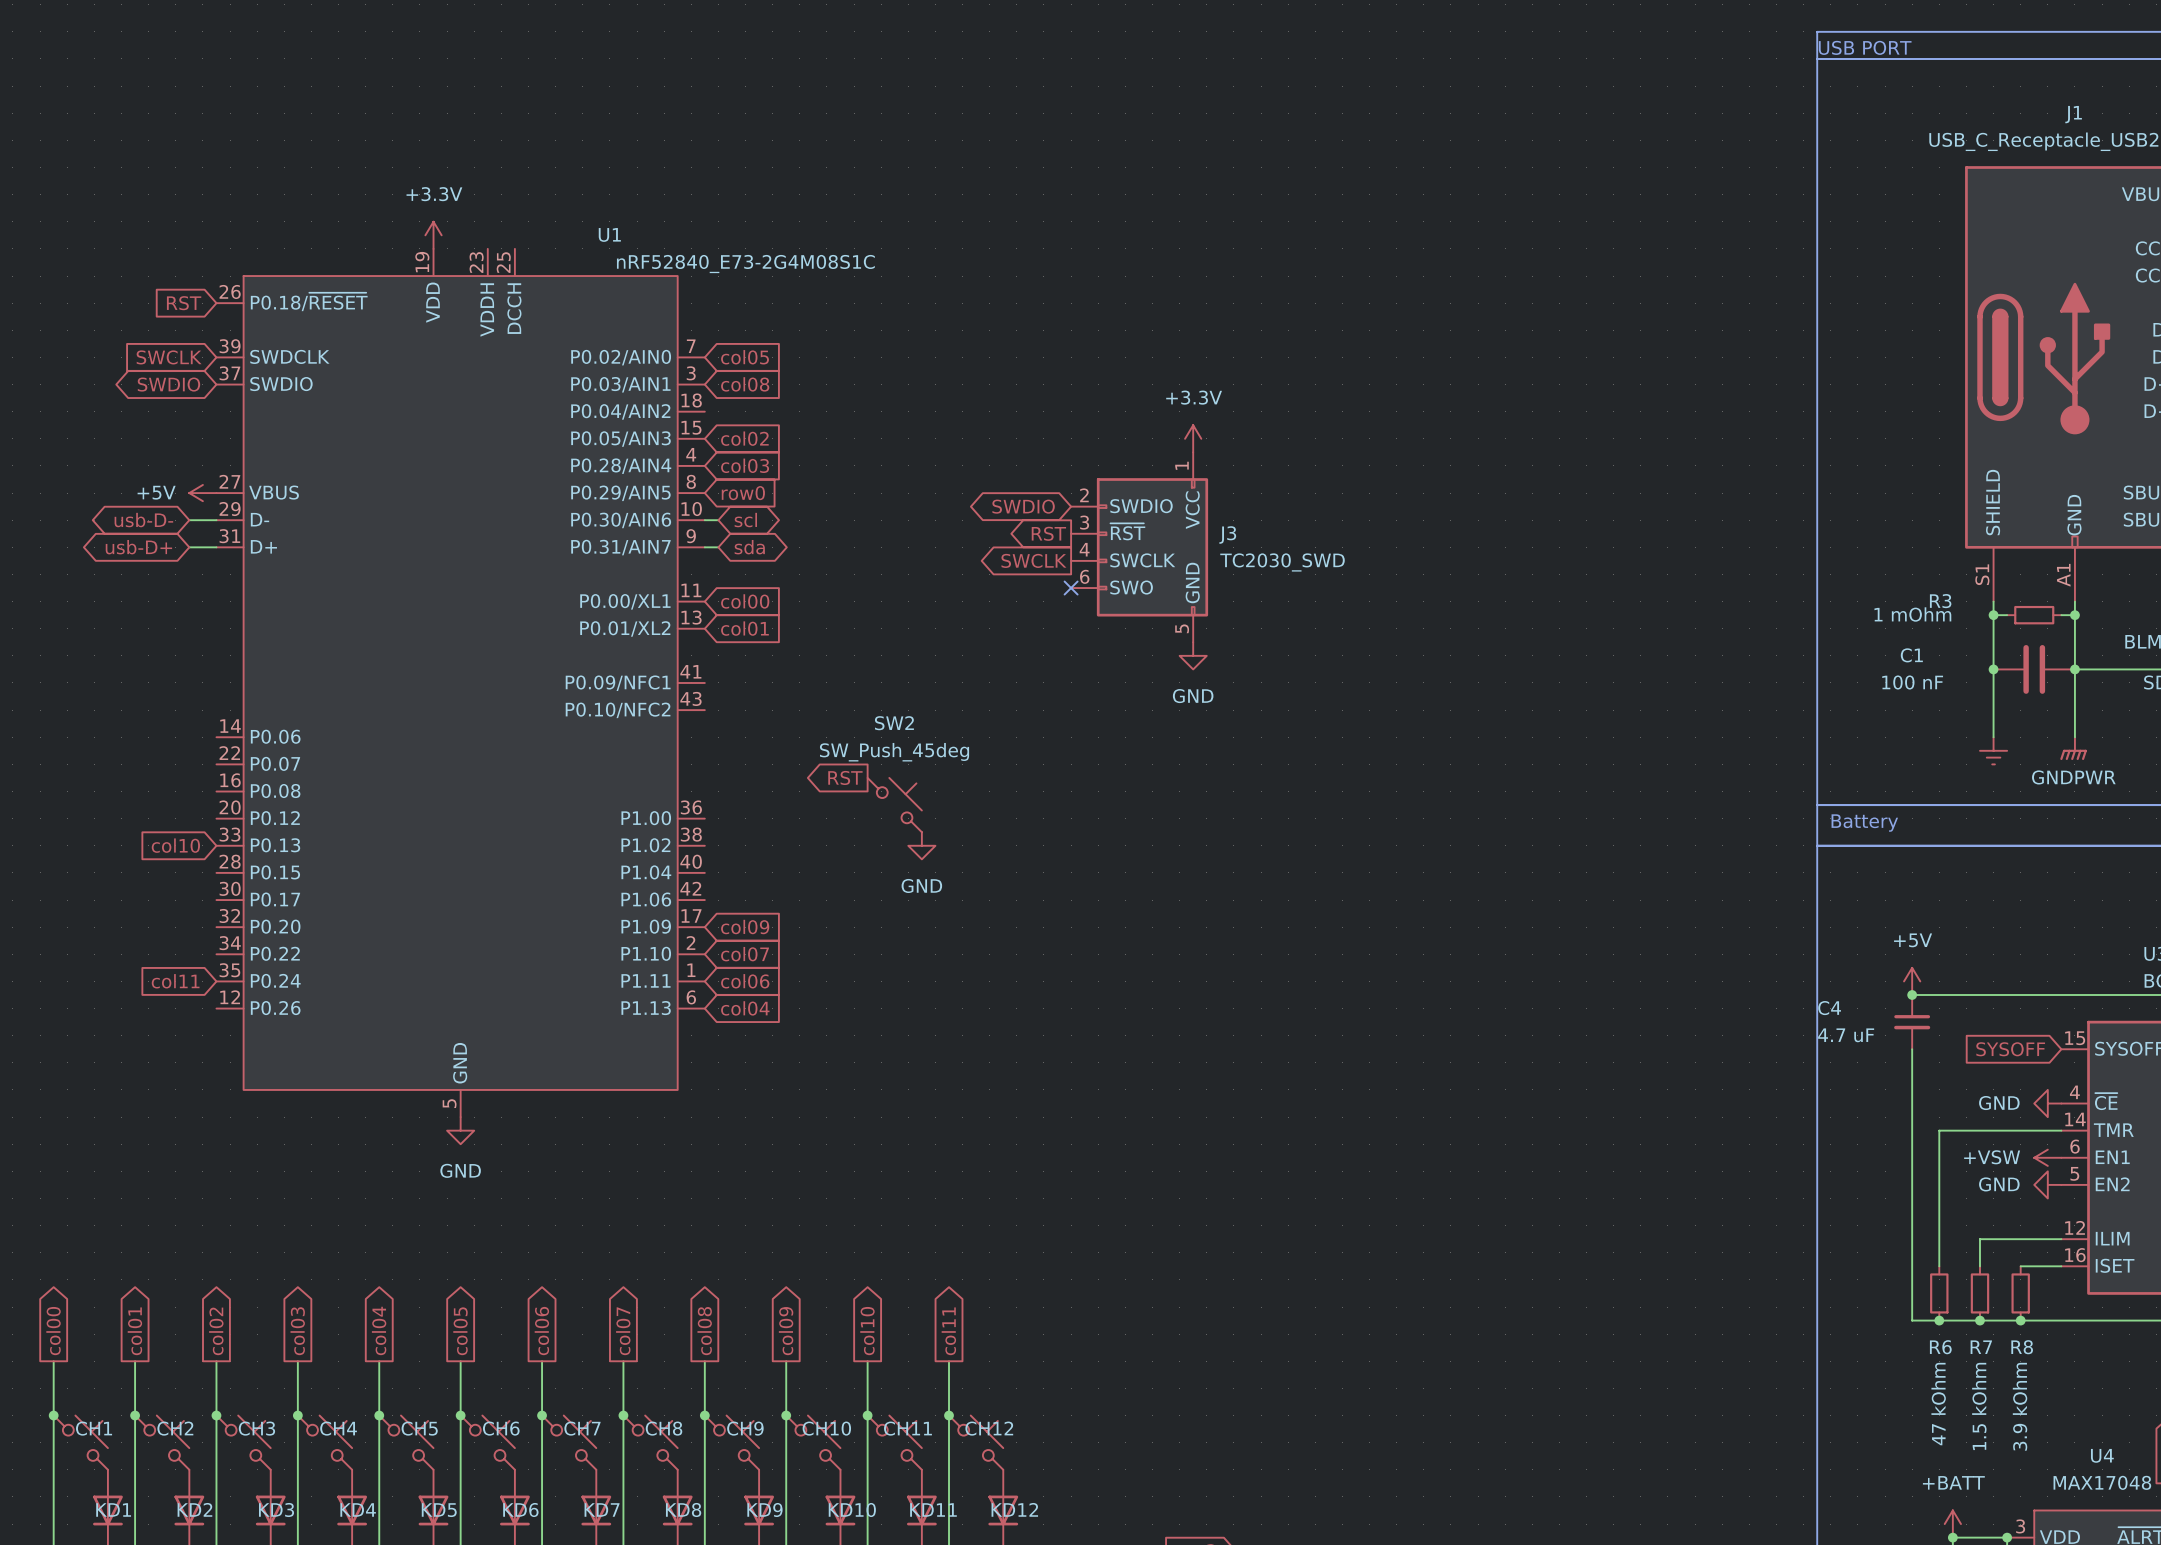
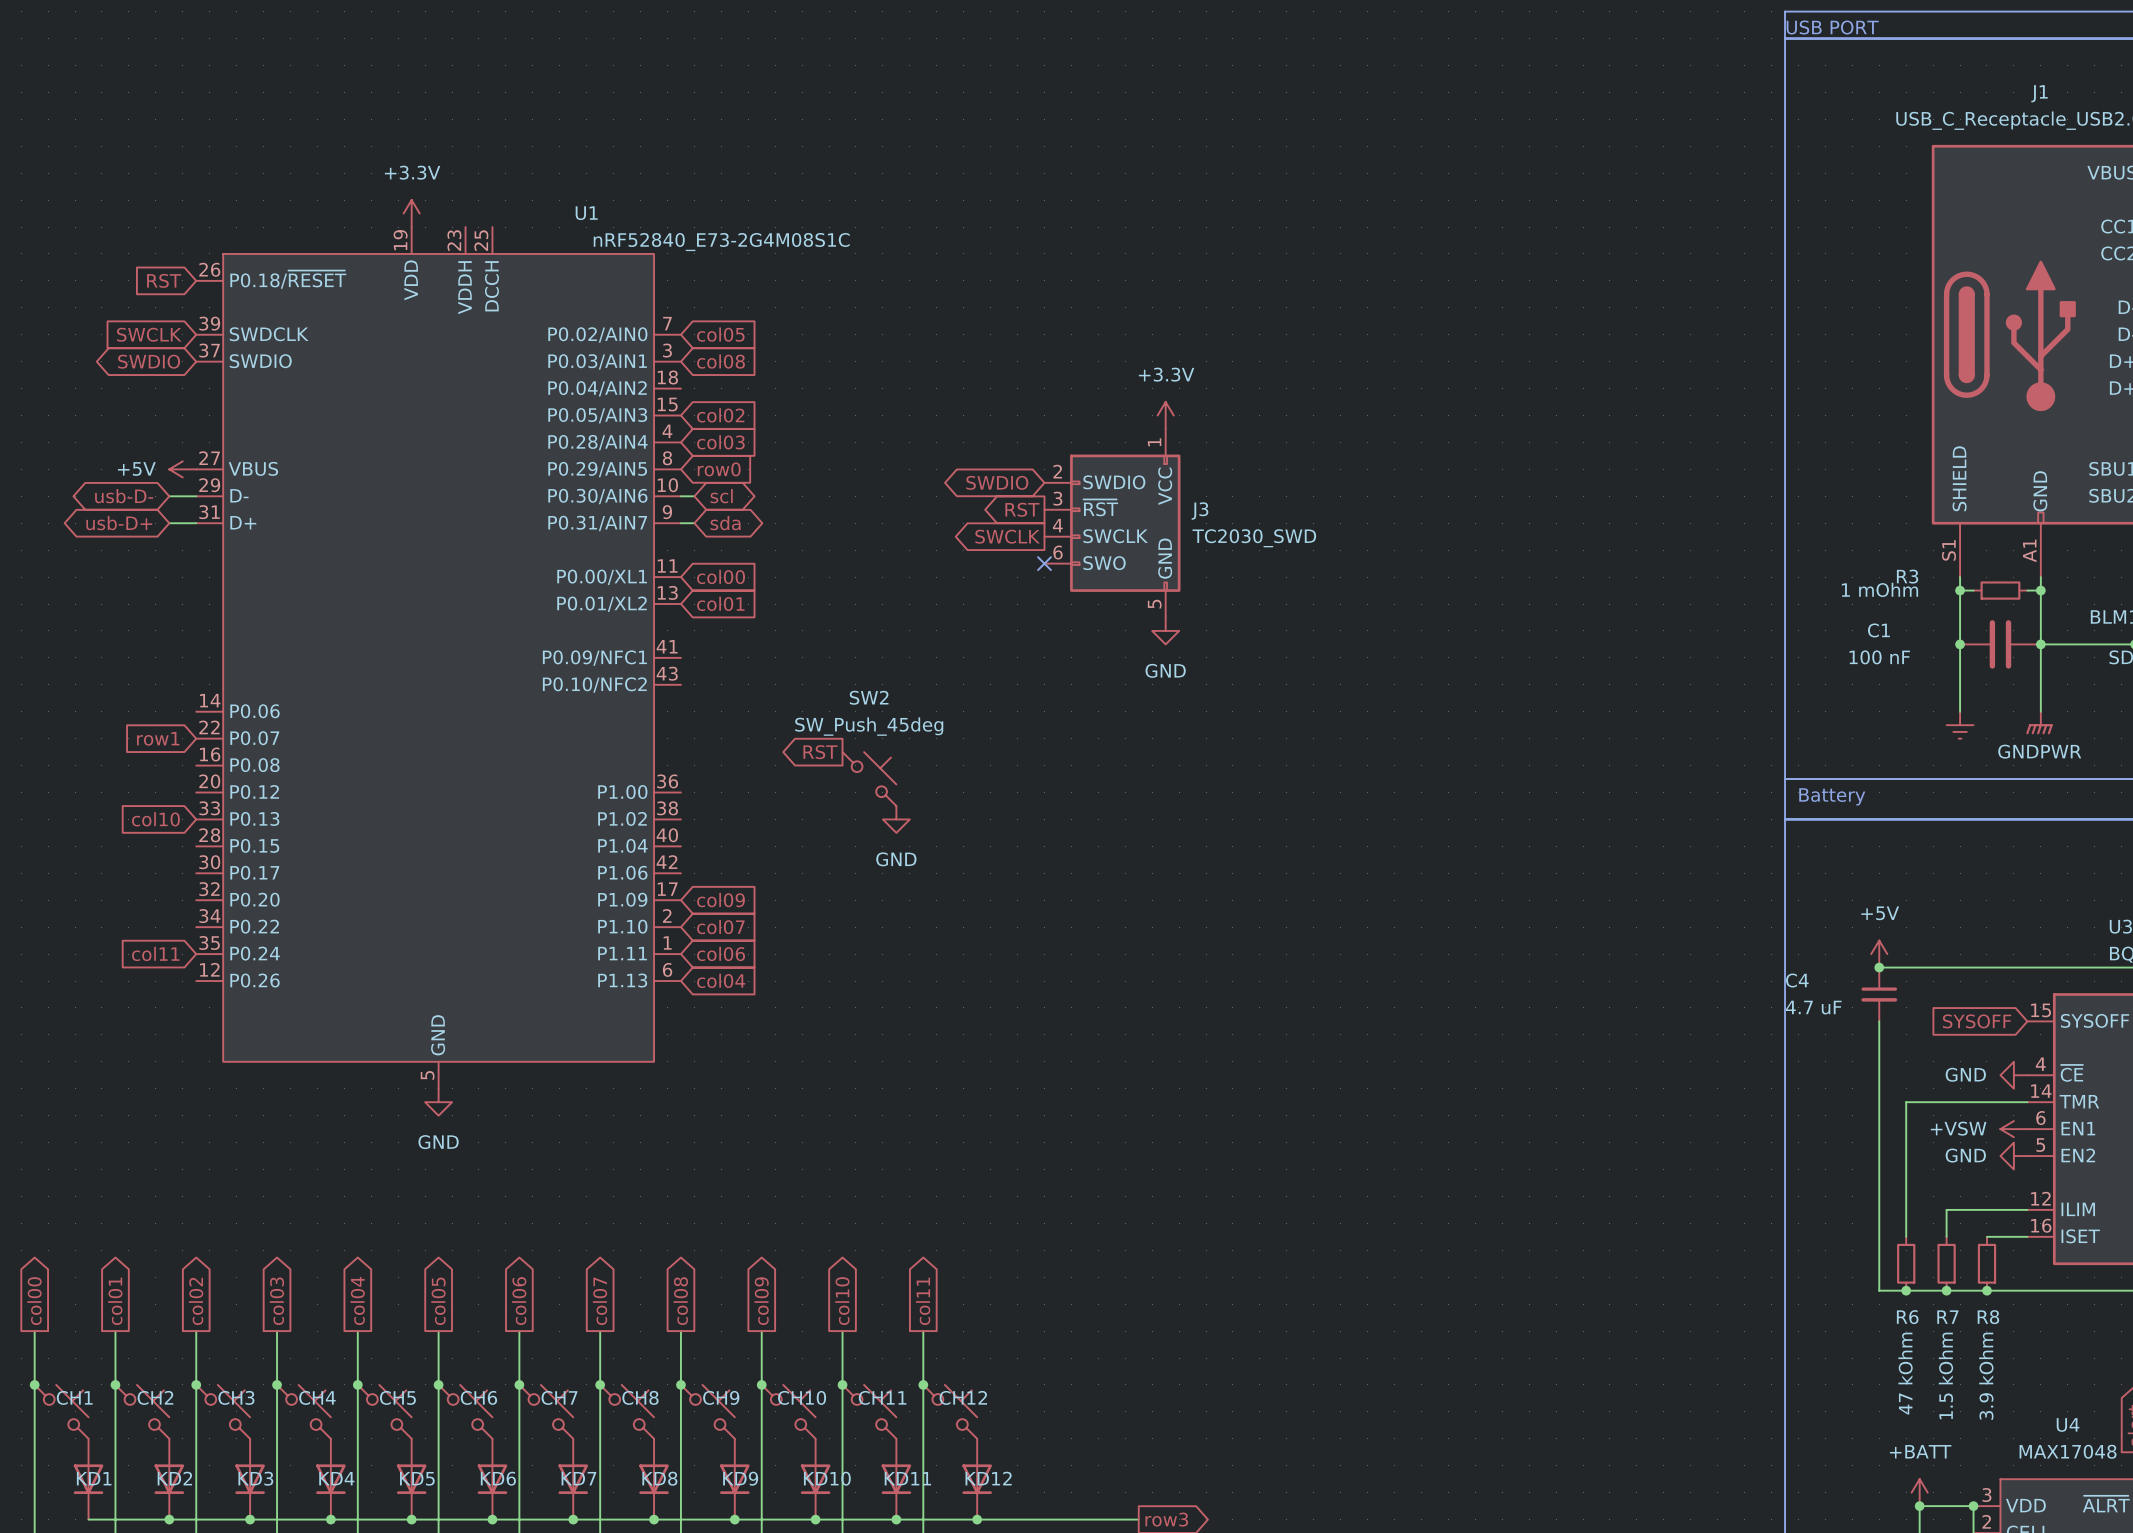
global label: none -> row1 (158, 738)

